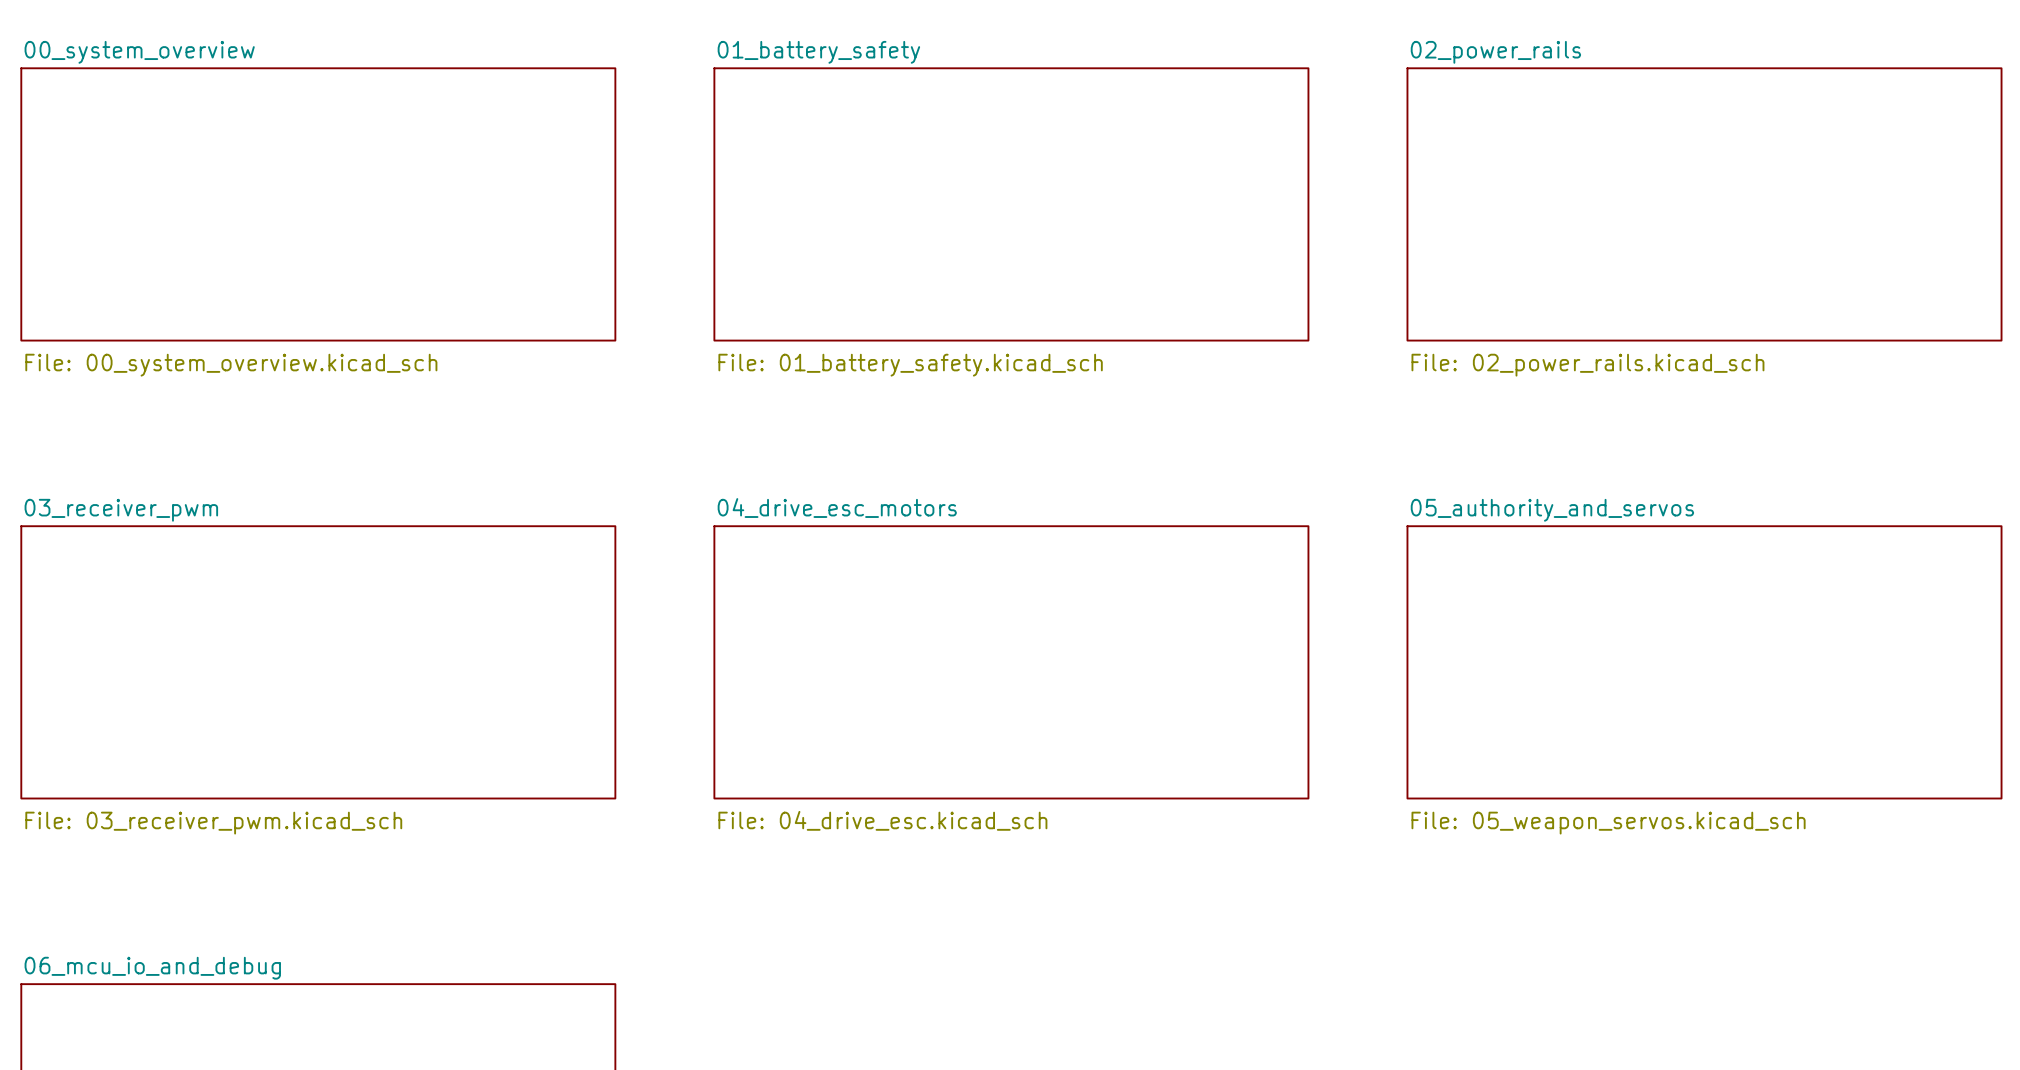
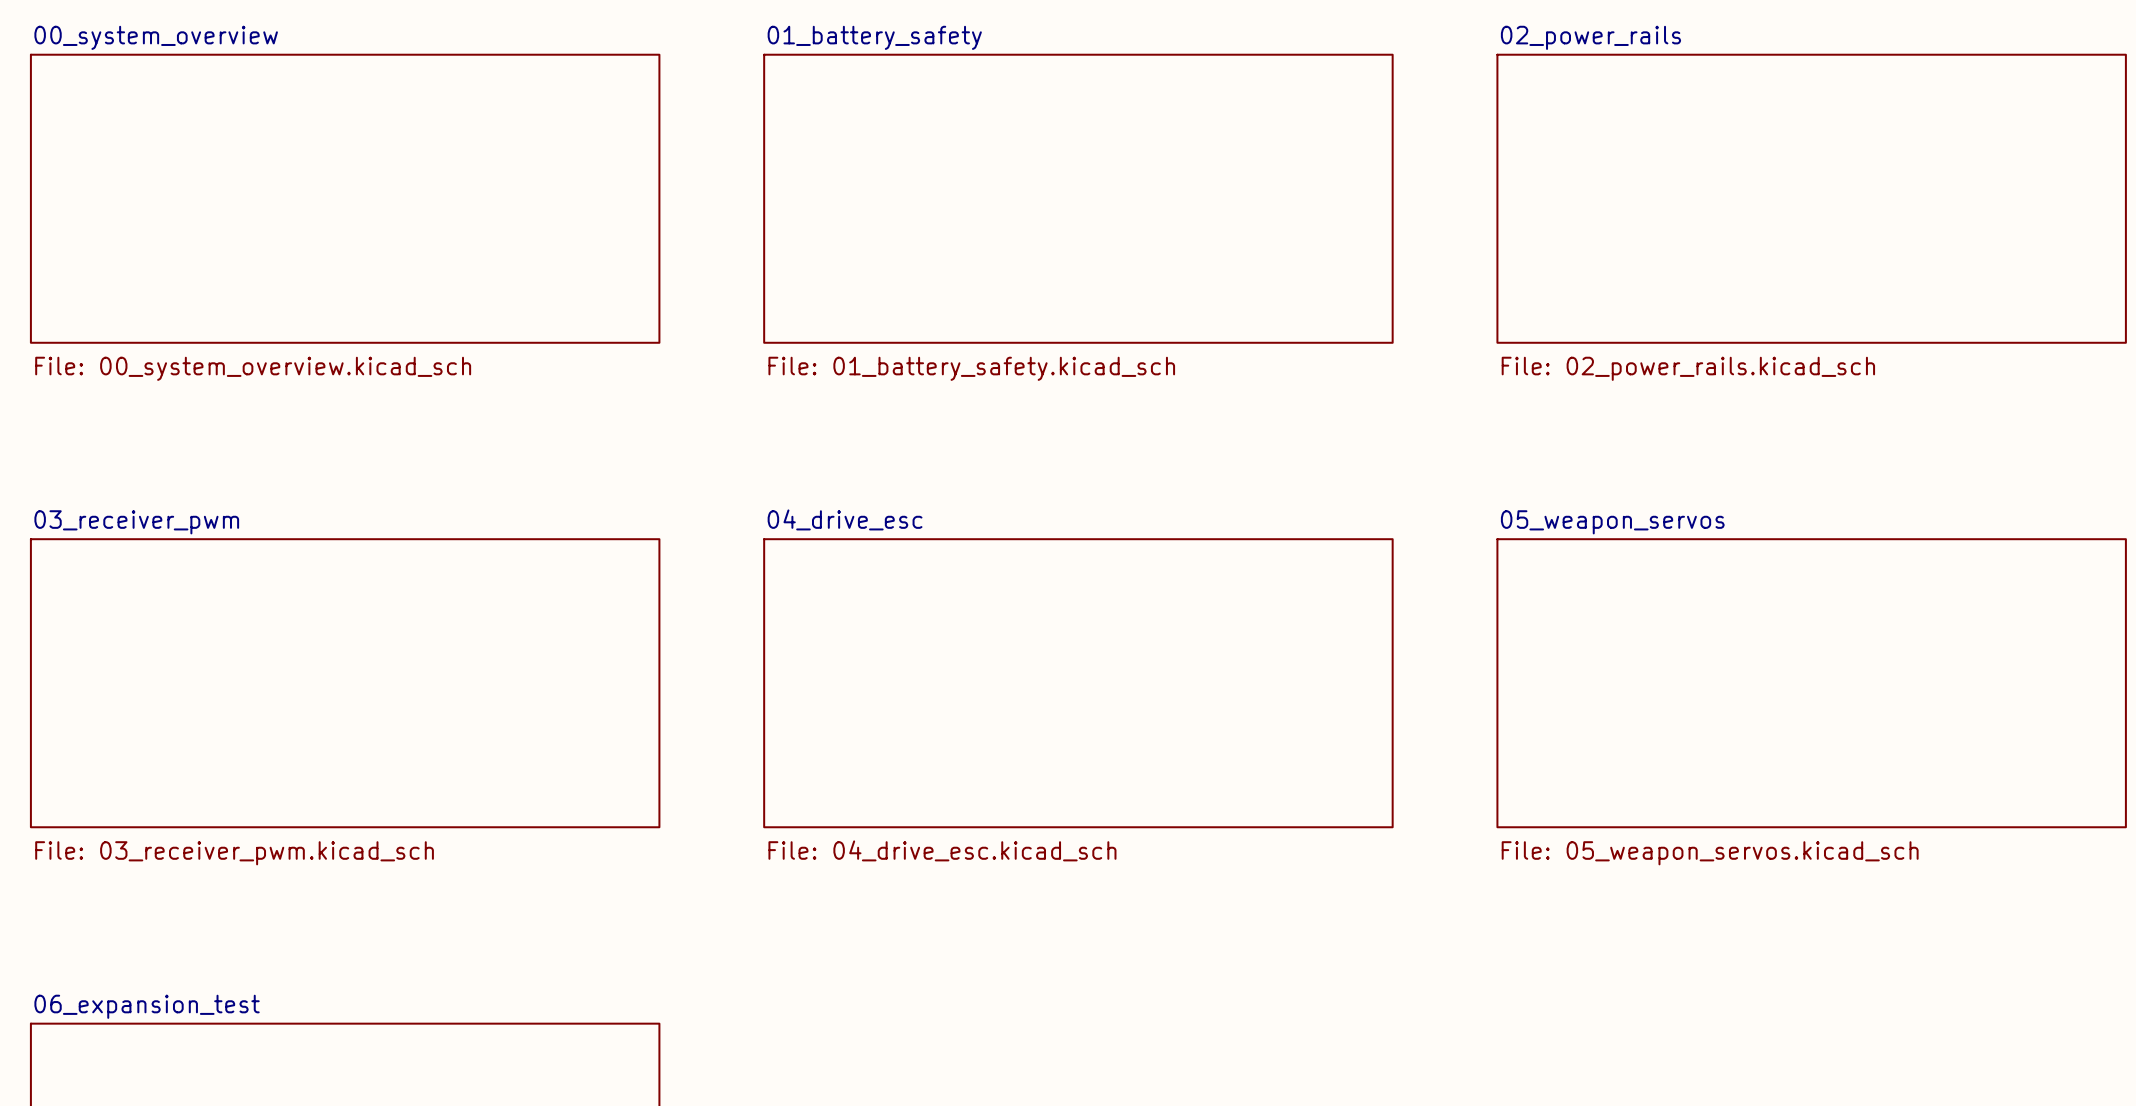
sheet 04_drive_esc_motors name: 04_drive_esc_motors (837, 508) -> 04_drive_esc (845, 519)
sheet 05_authority_and_servos name: 05_authority_and_servos (1552, 510) -> 05_weapon_servos (1612, 522)
sheet 06_mcu_io_and_debug name: 06_mcu_io_and_debug (152, 968) -> 06_expansion_test (147, 1006)

